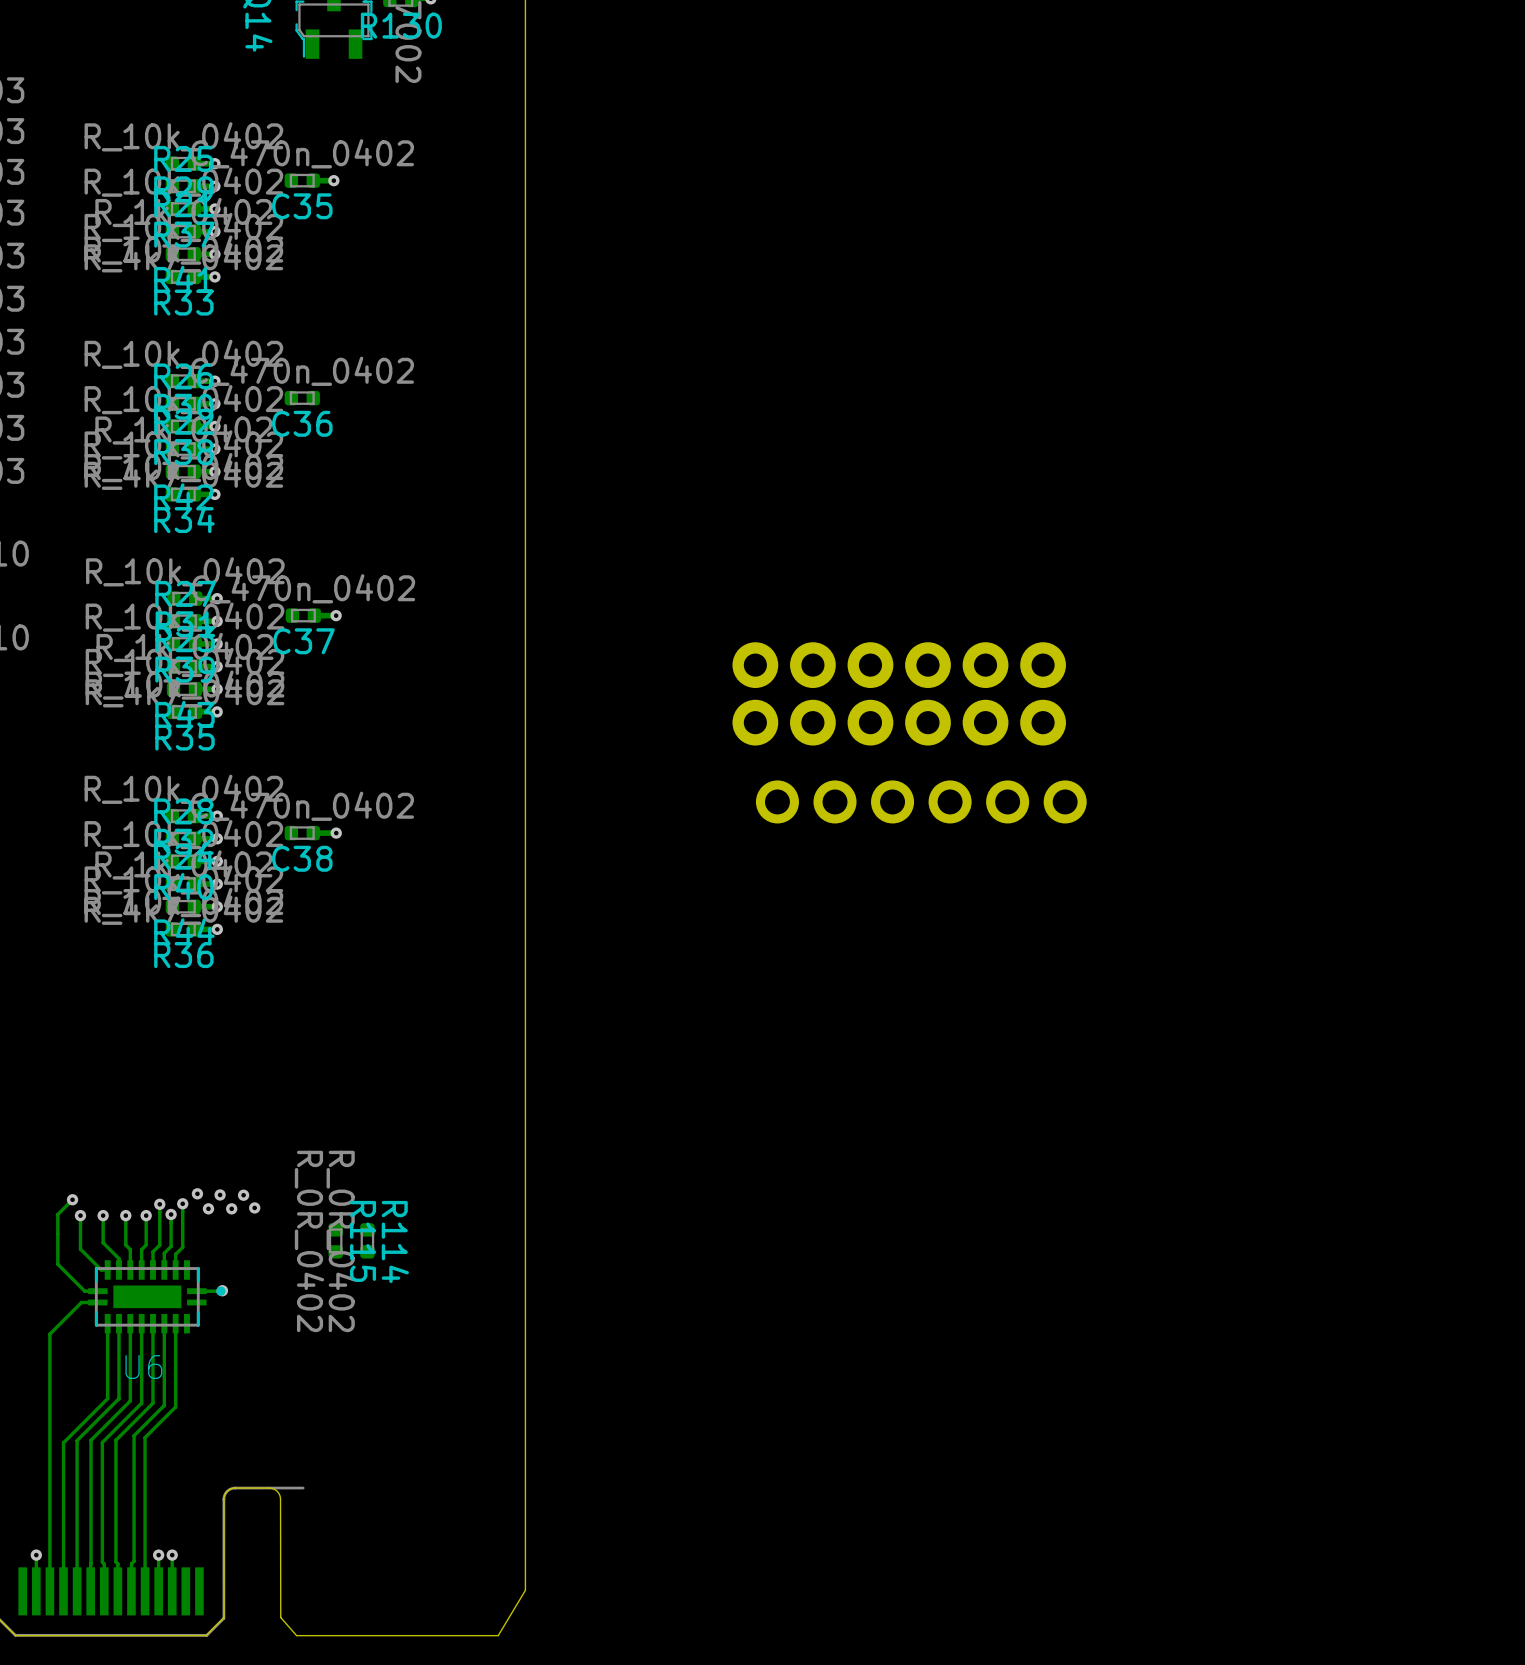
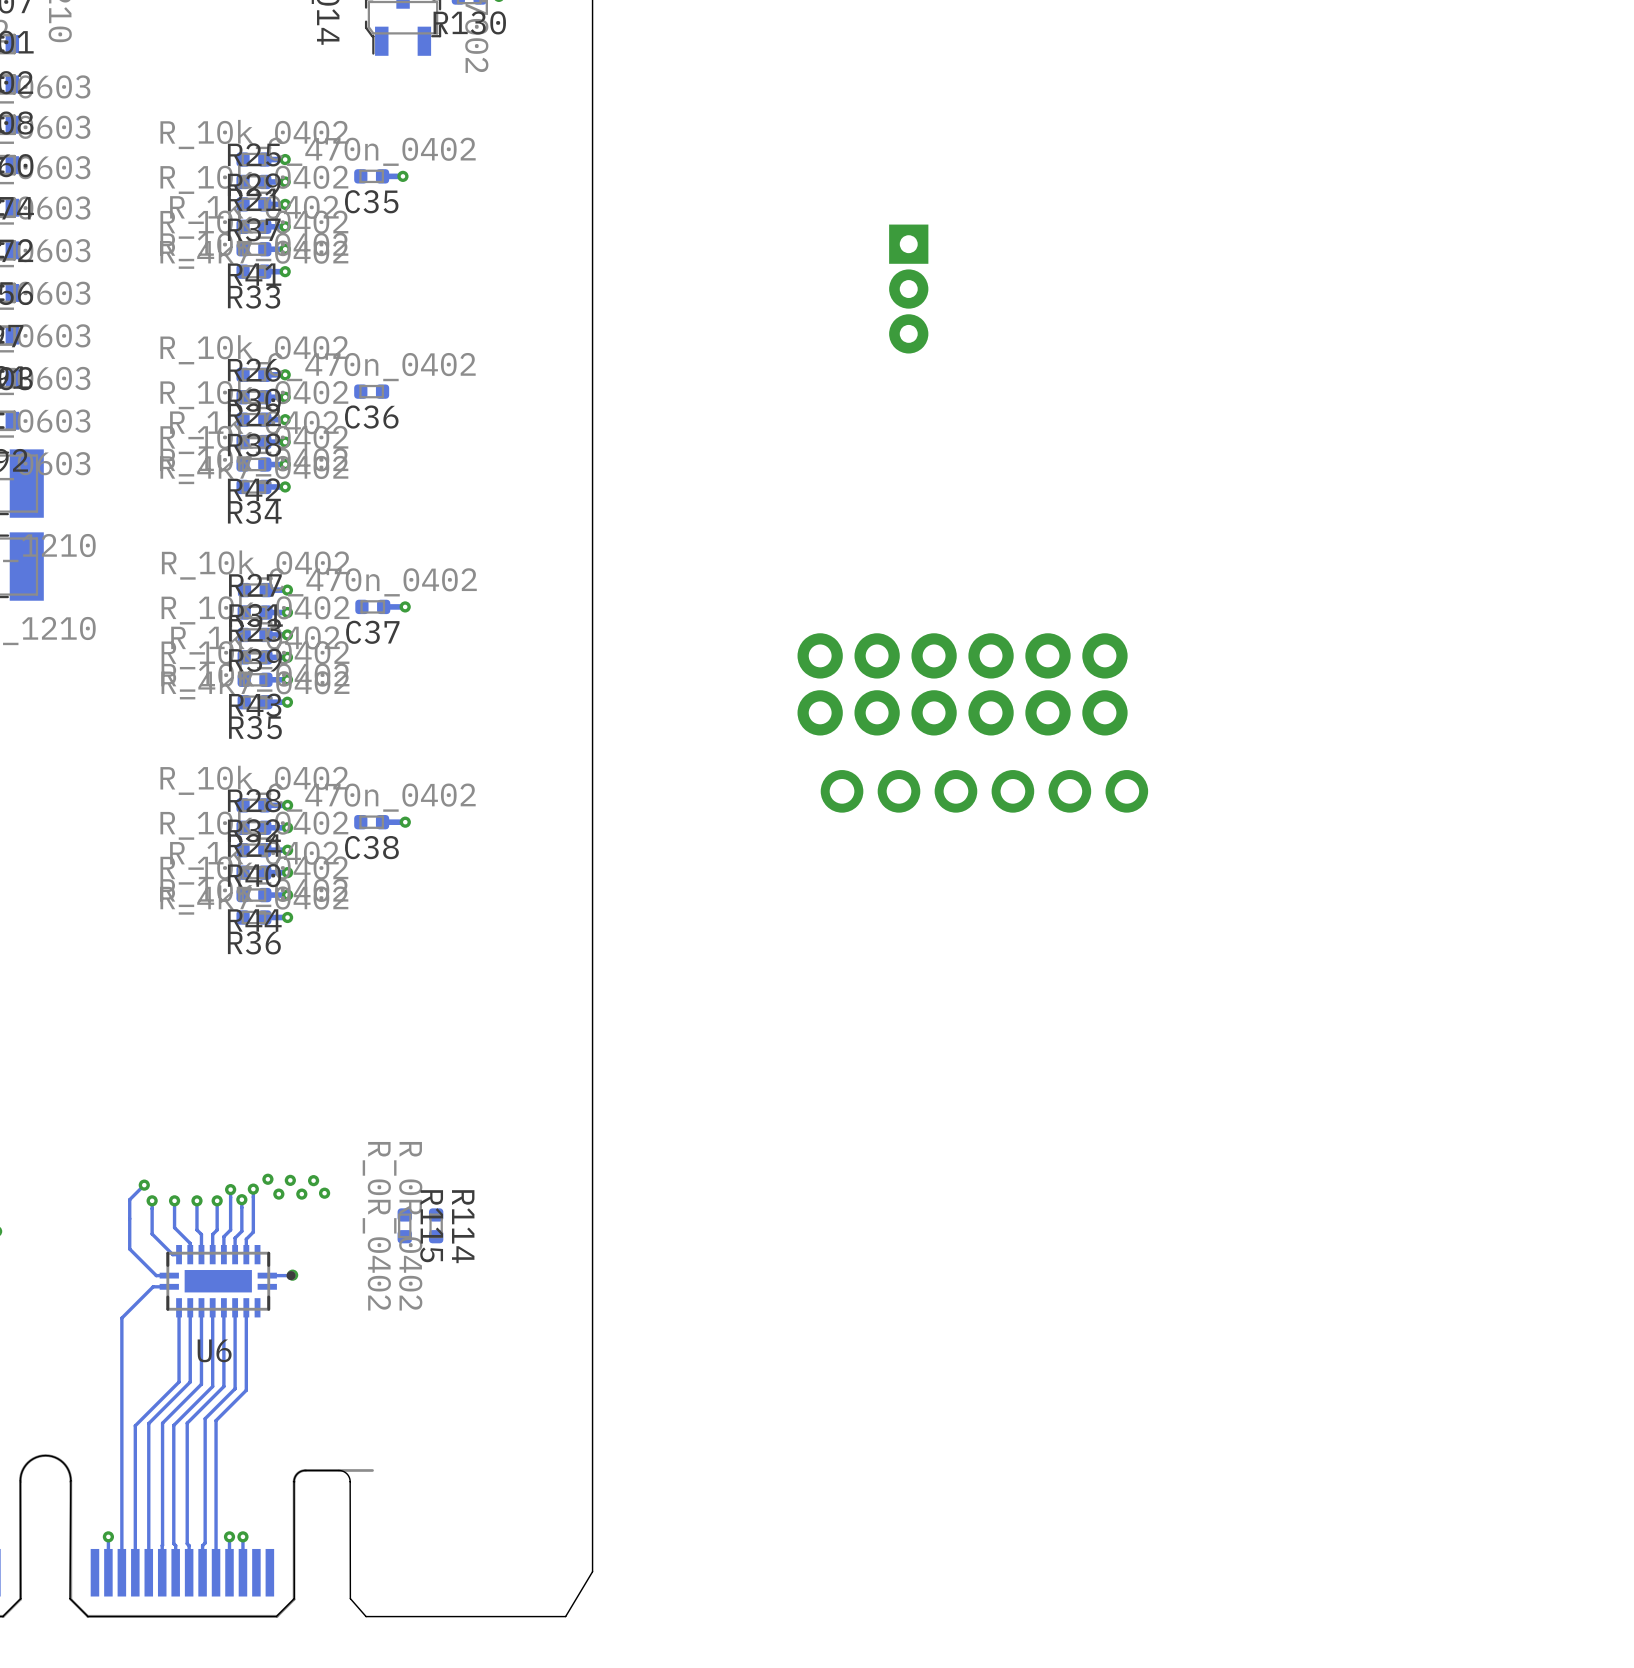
part: none -> (908, 289)

